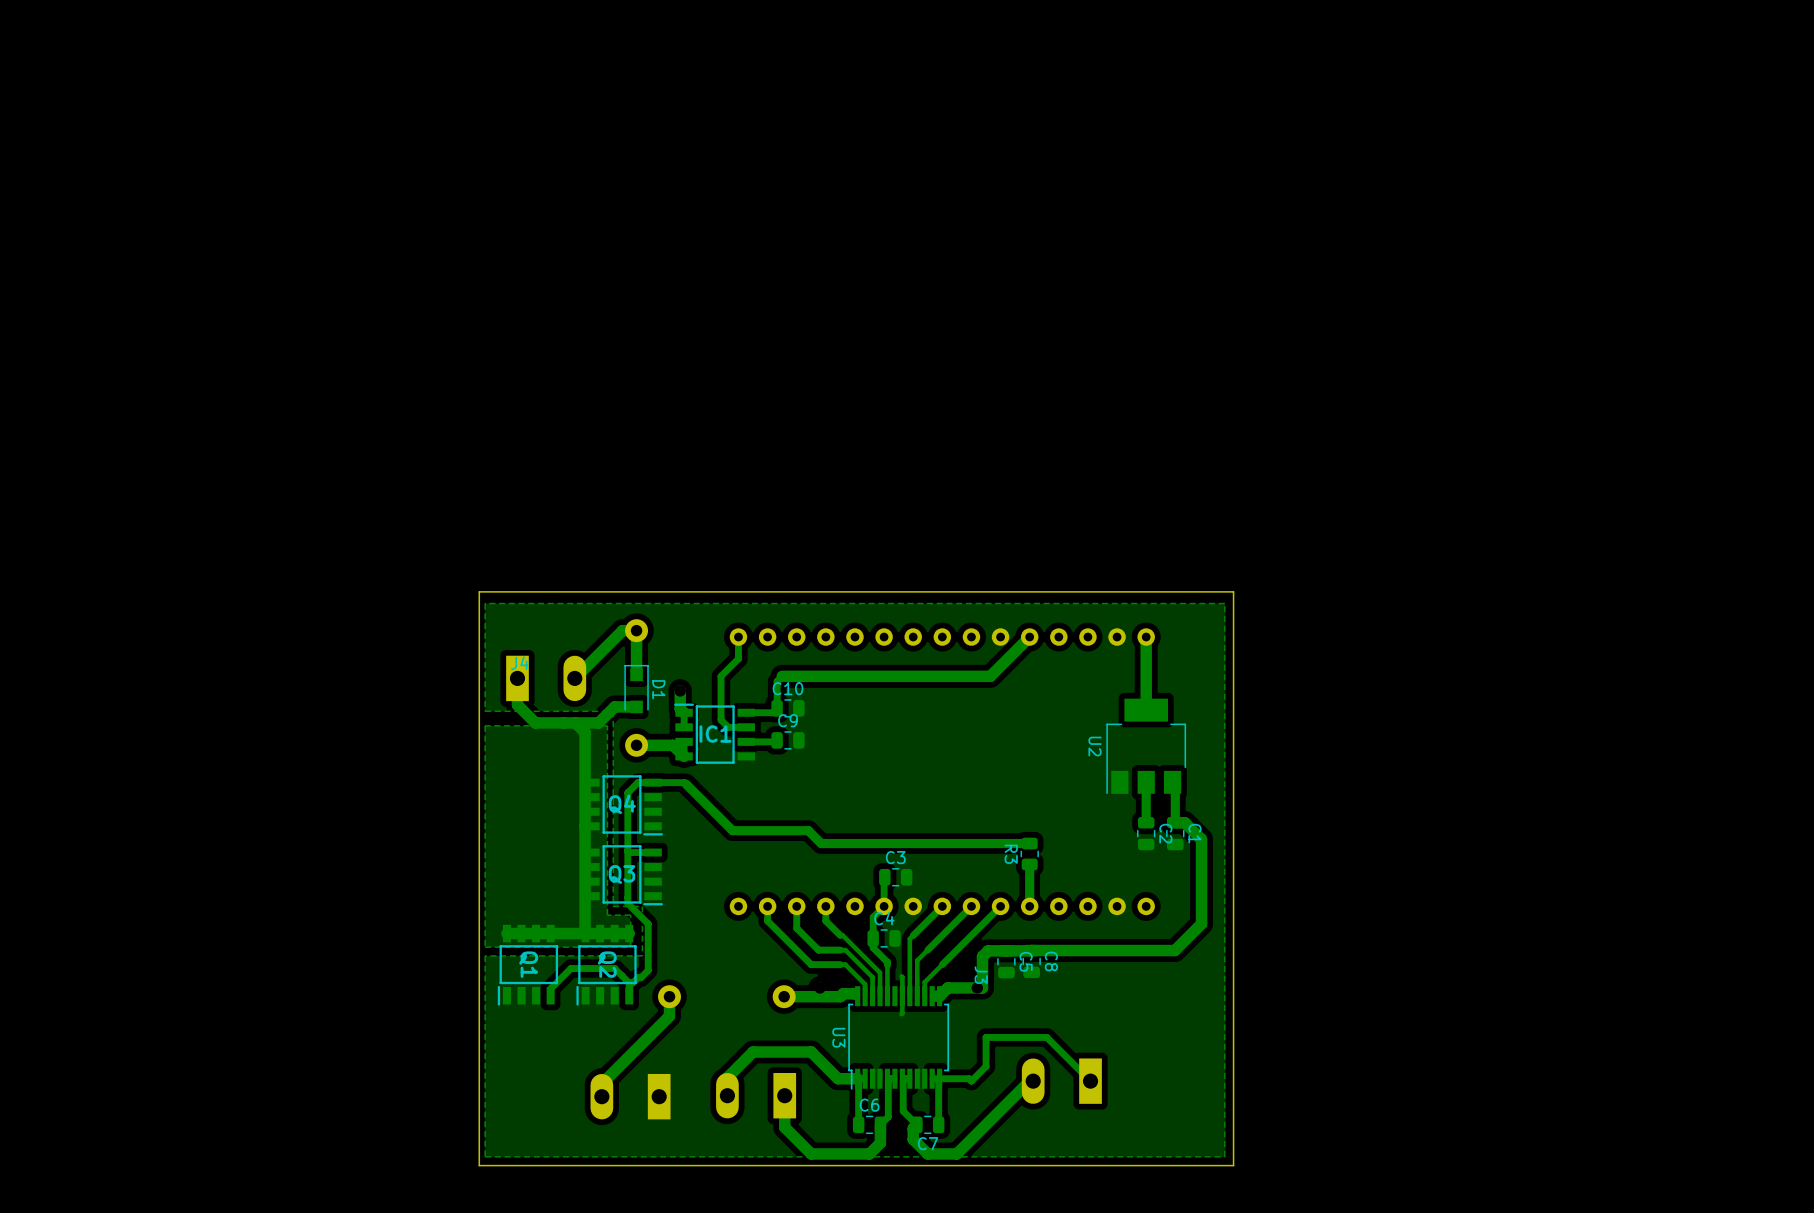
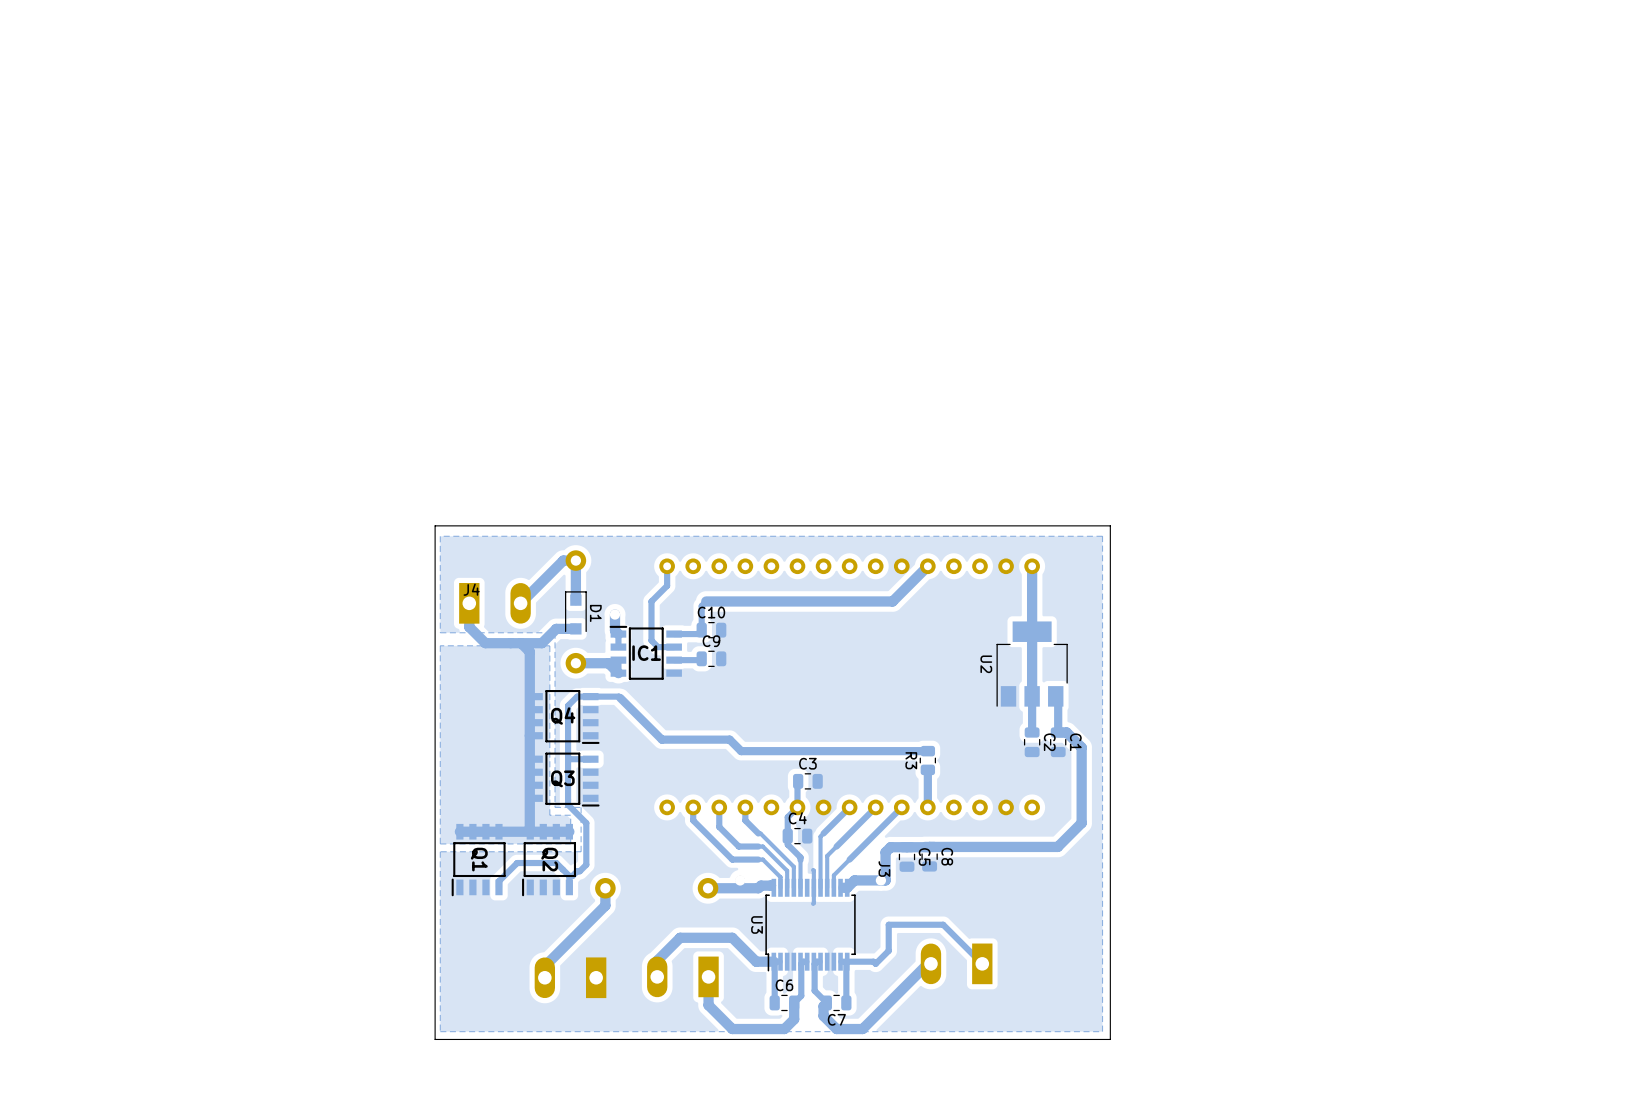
track: none -> (1032, 631) (1032, 696)

